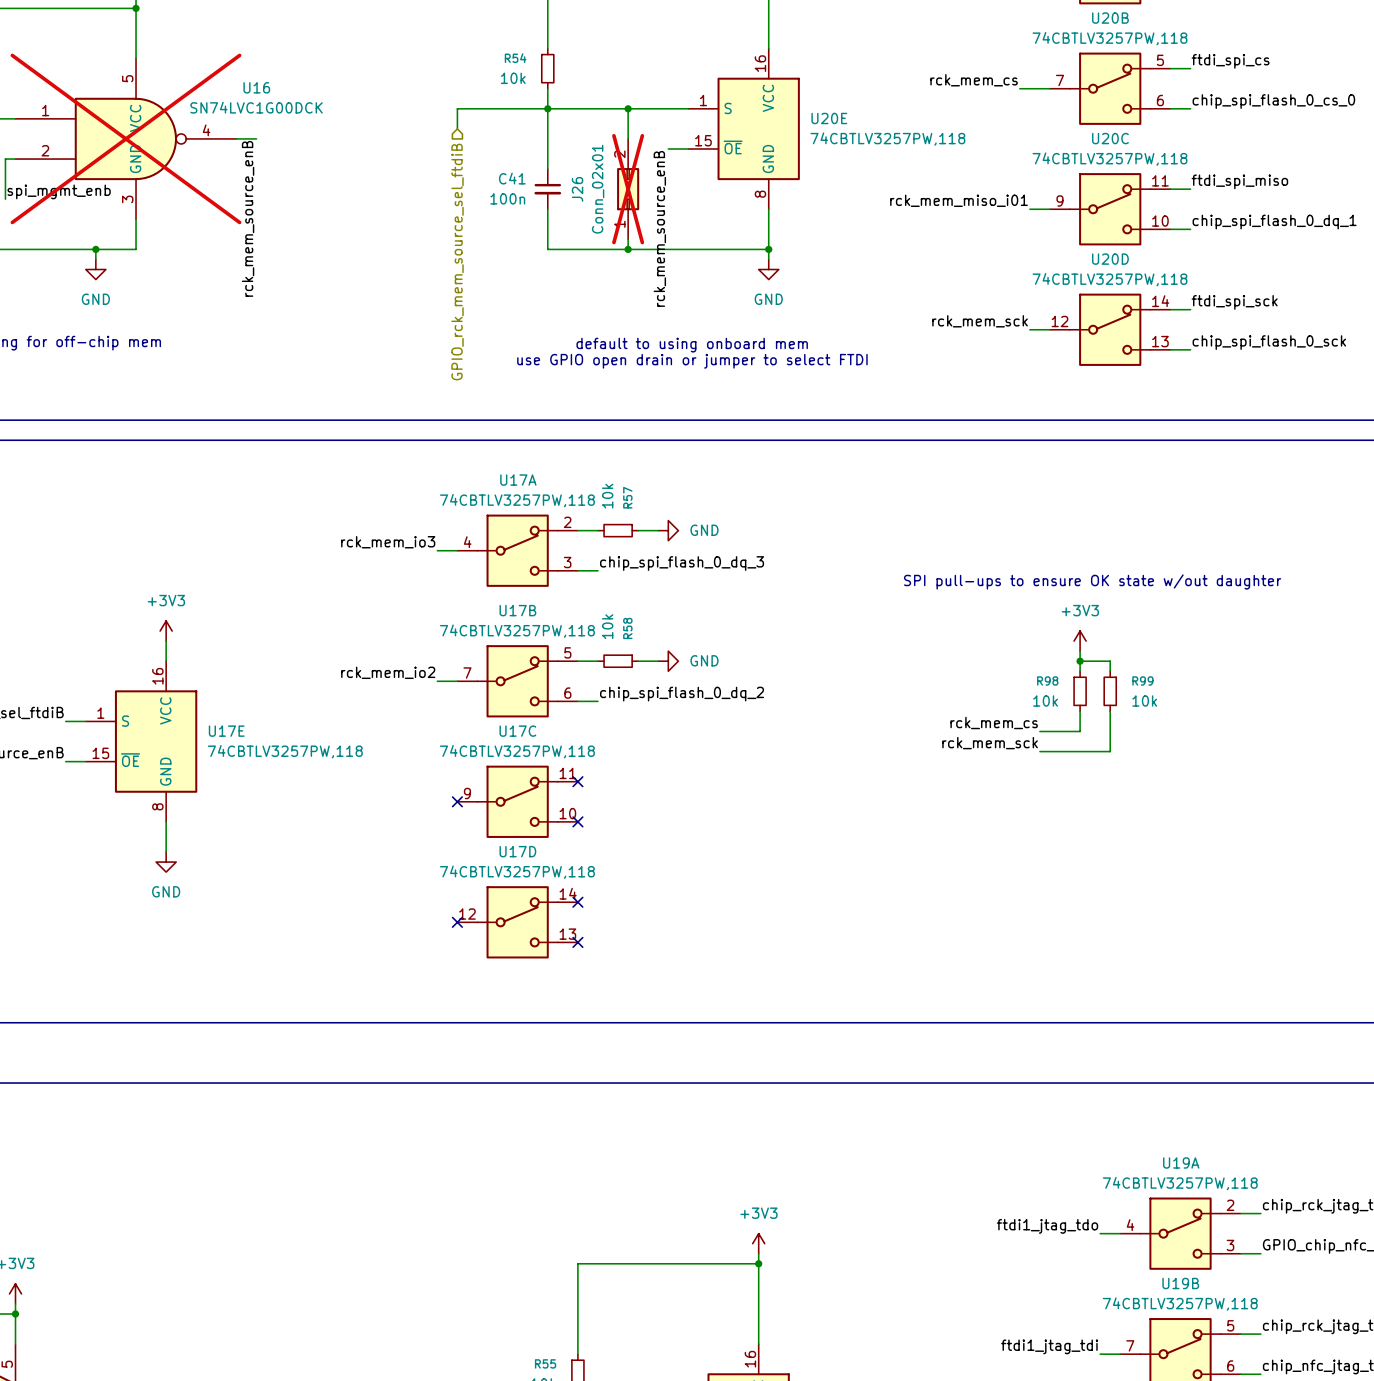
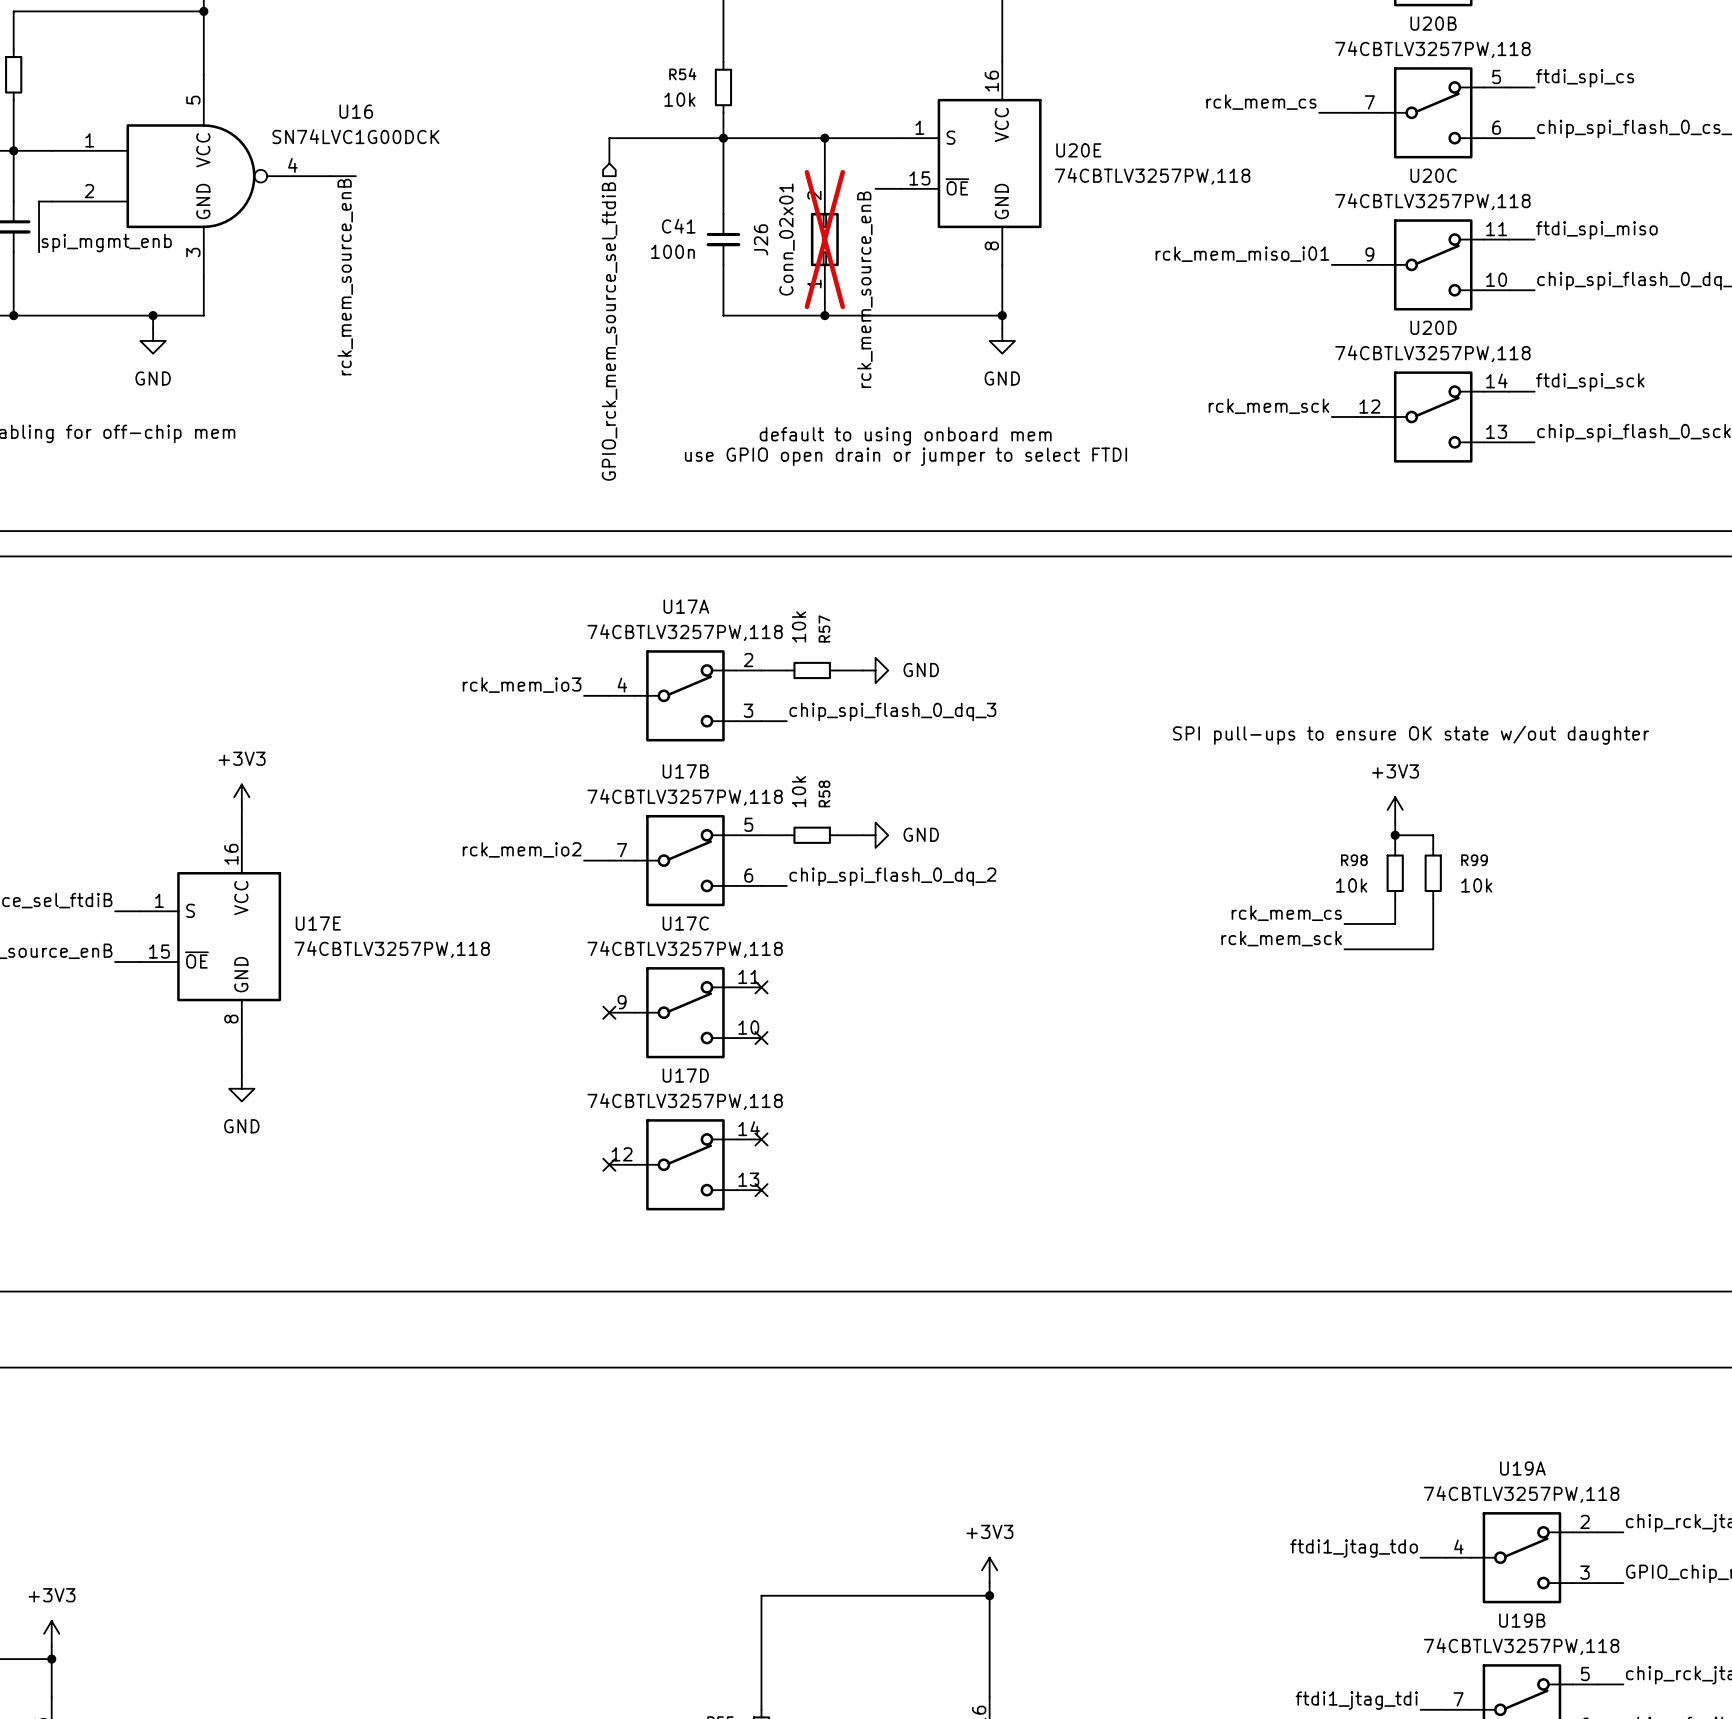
U16 do-not-place cross: (125, 138) -> none

